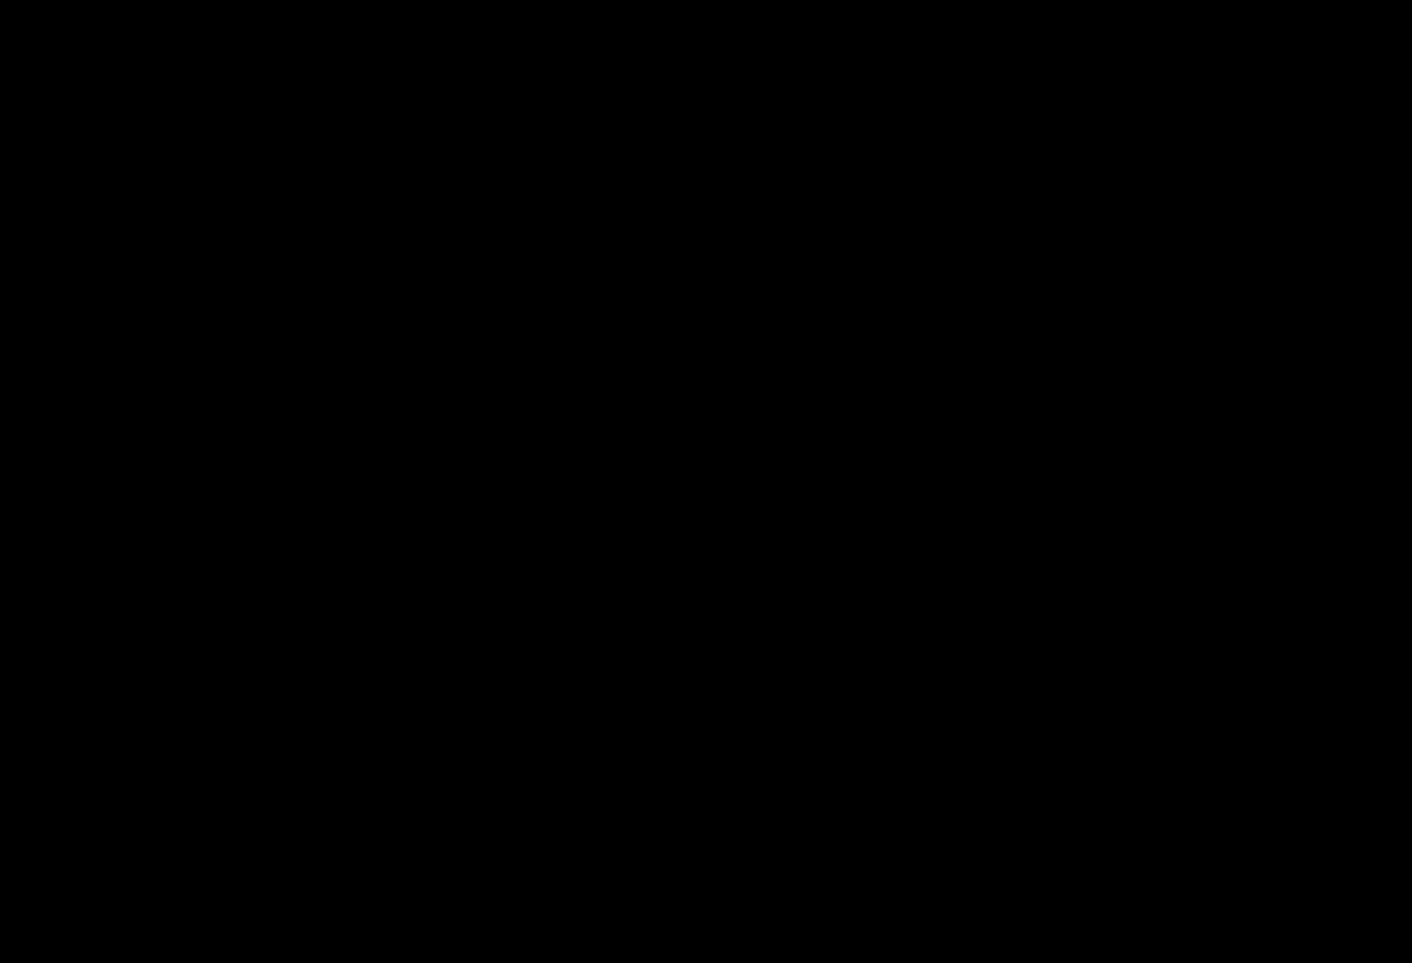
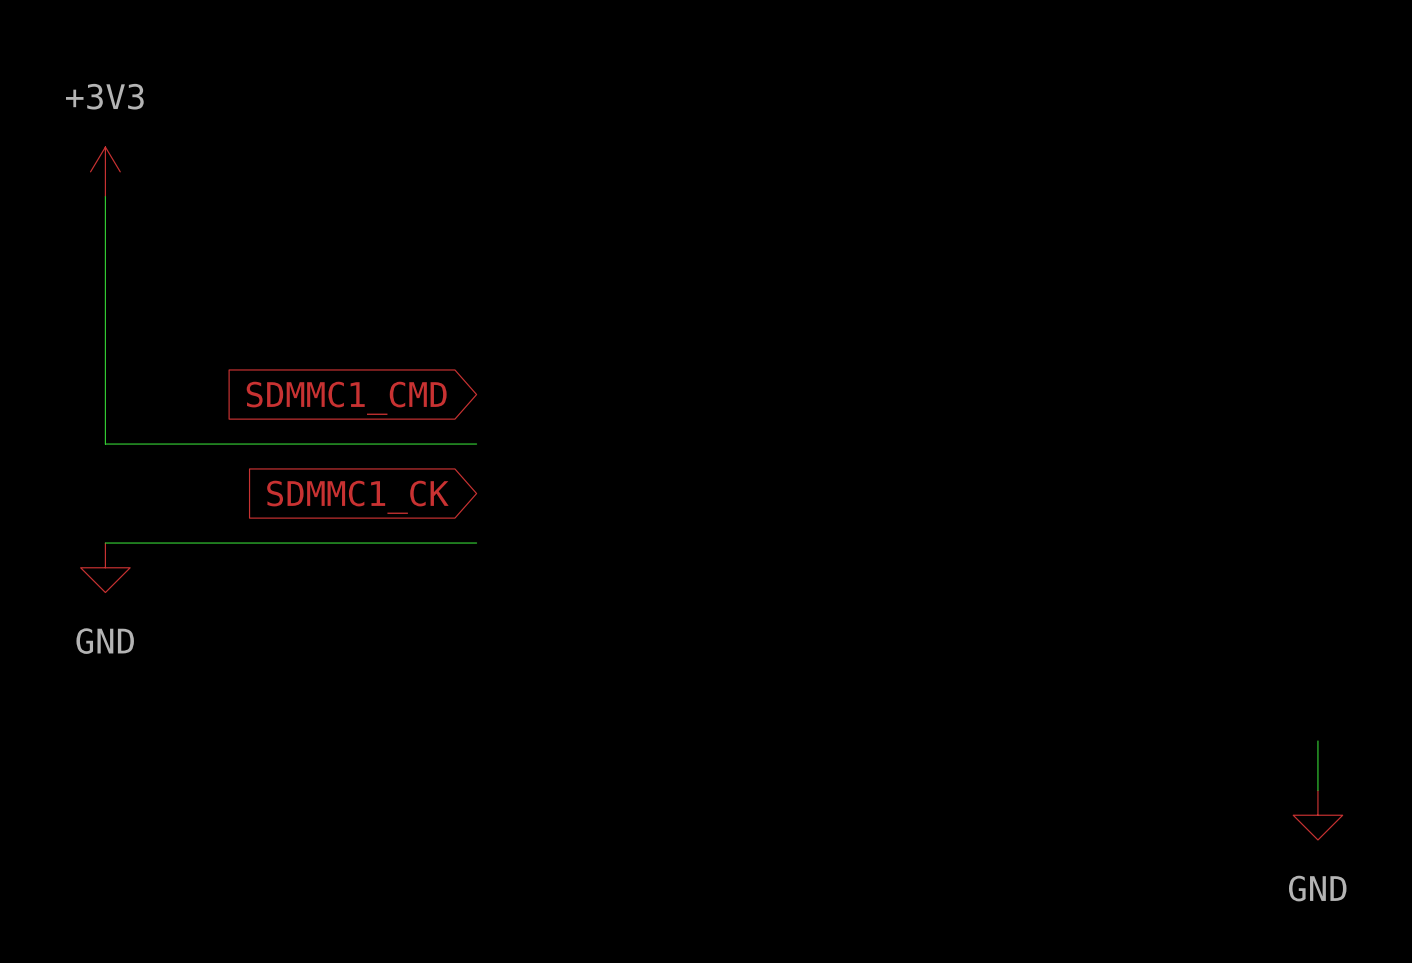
power symbol: none -> +3V3 (105, 171)
wire: none -> (105, 196) (105, 444) (476, 444)
global label: none -> SDMMC1_CMD (346, 398)
global label: none -> SDMMC1_CK (357, 497)
wire: none -> (105, 543) (476, 543)
power symbol: none -> GND (105, 567)
wire: none -> (1317, 740) (1317, 790)
power symbol: none -> GND (1317, 815)

